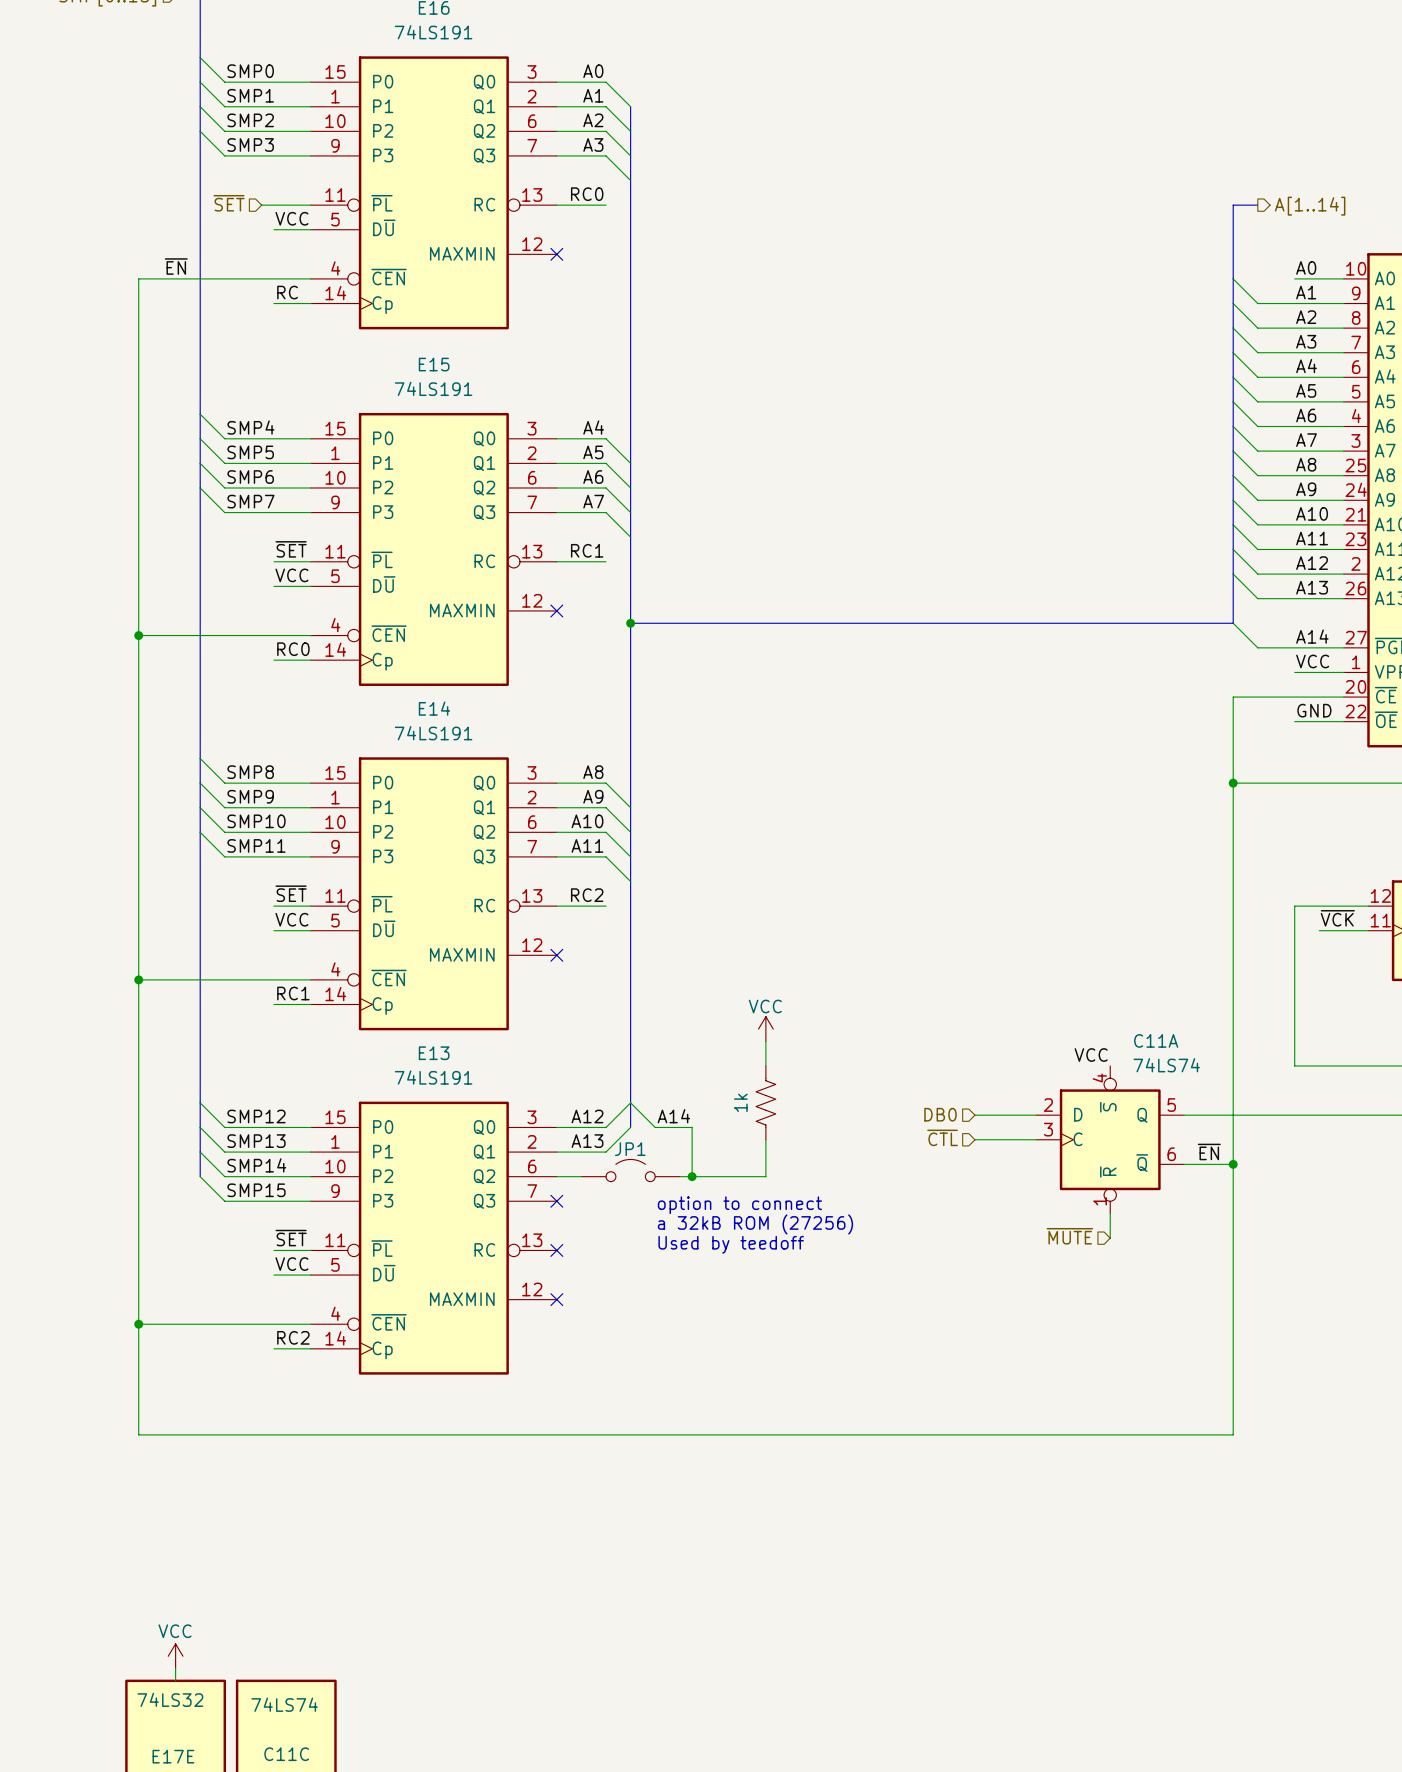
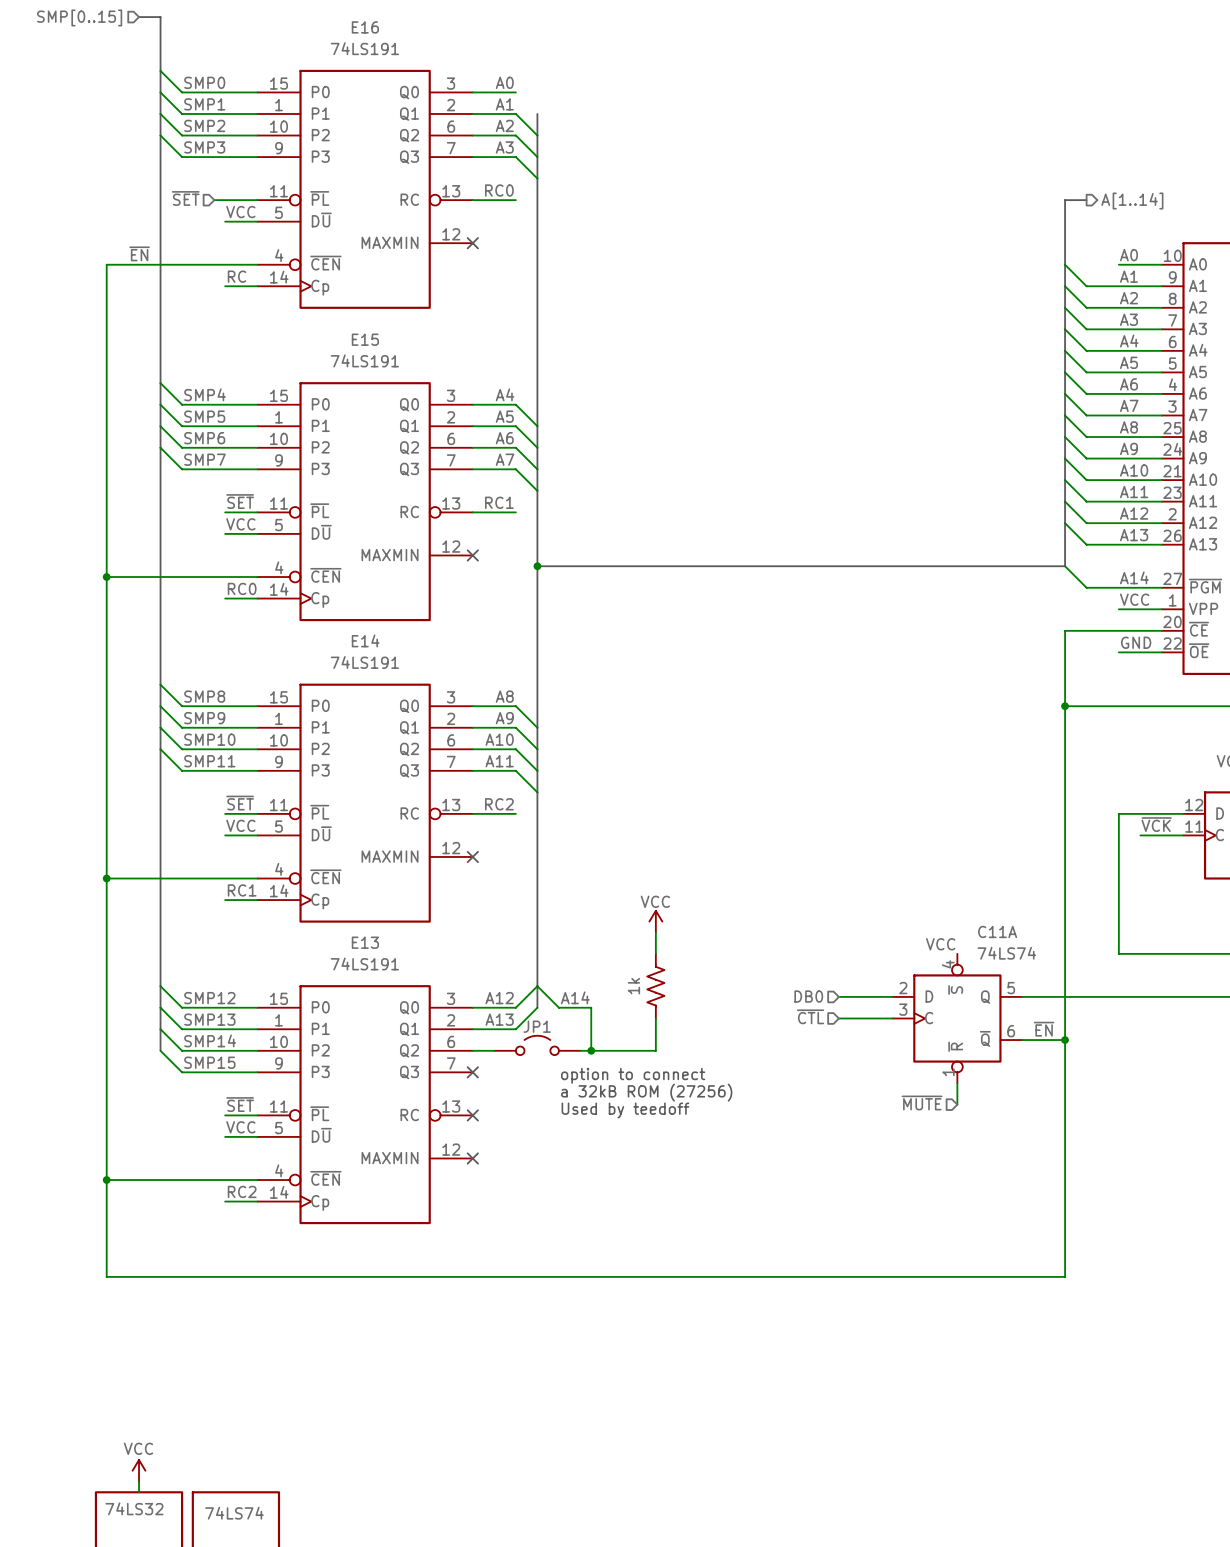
wire: (606, 82) (630, 106) -> none

